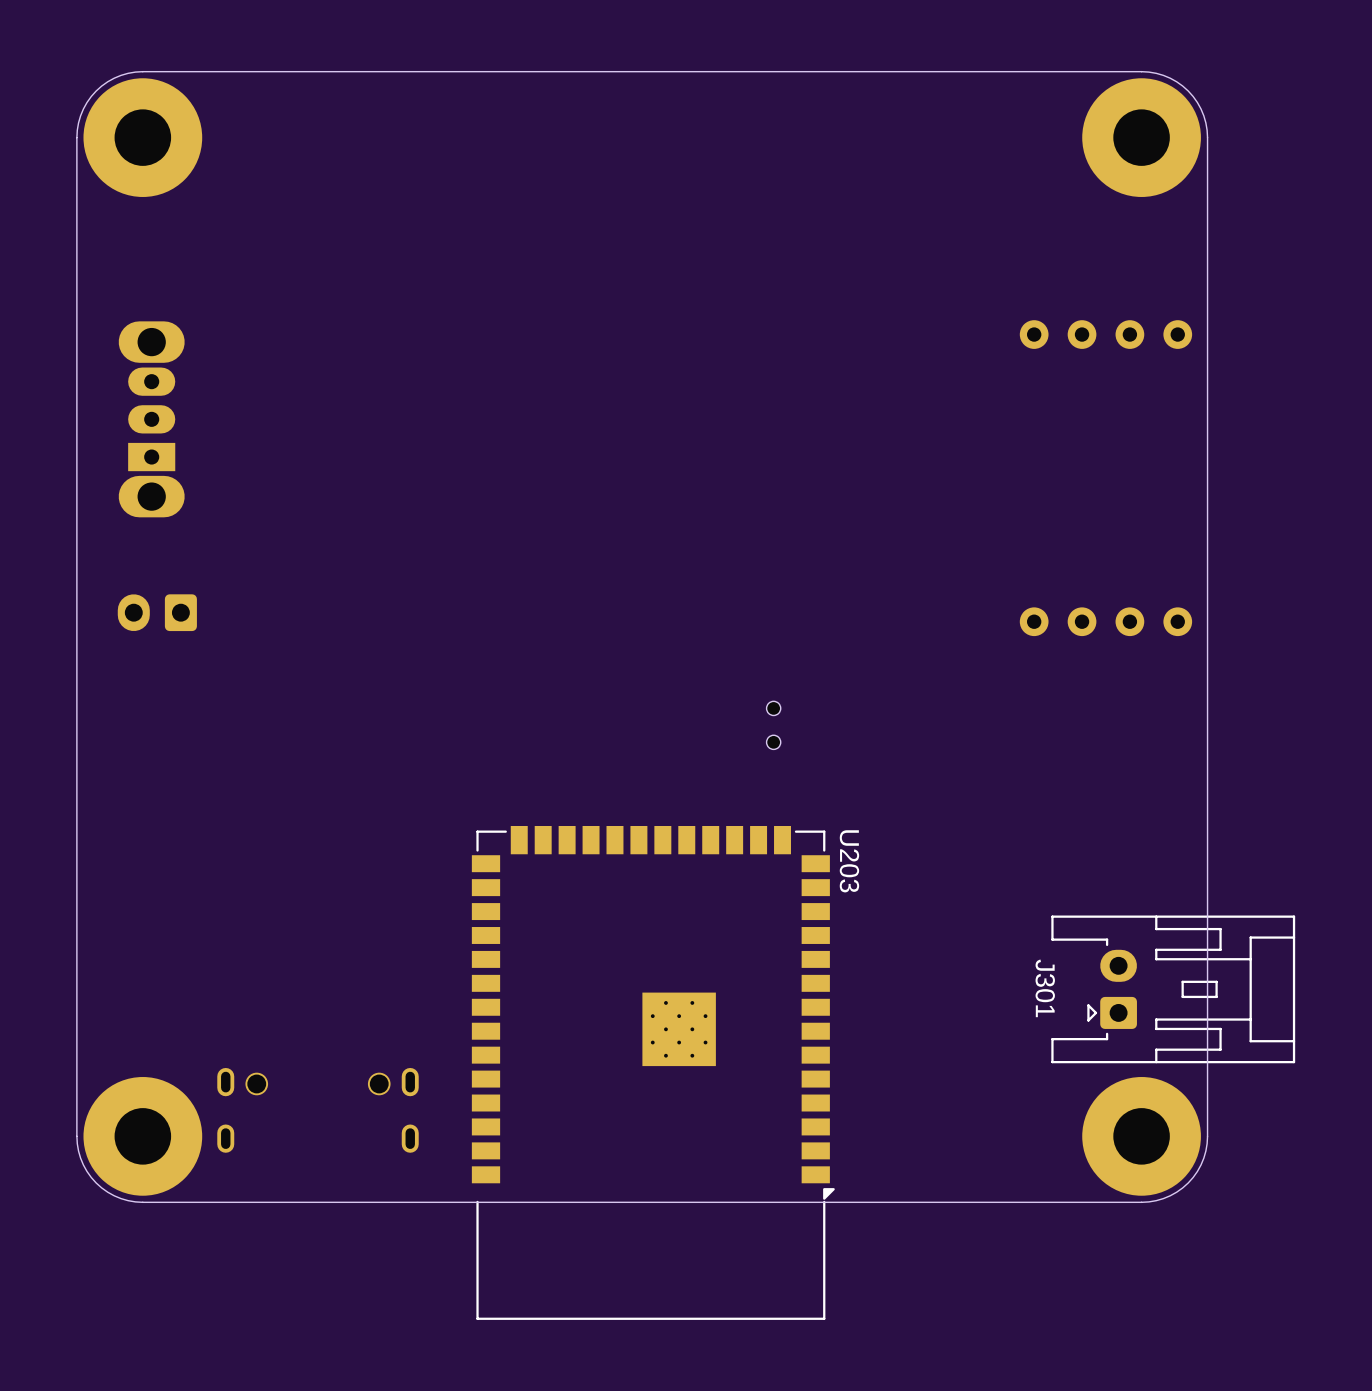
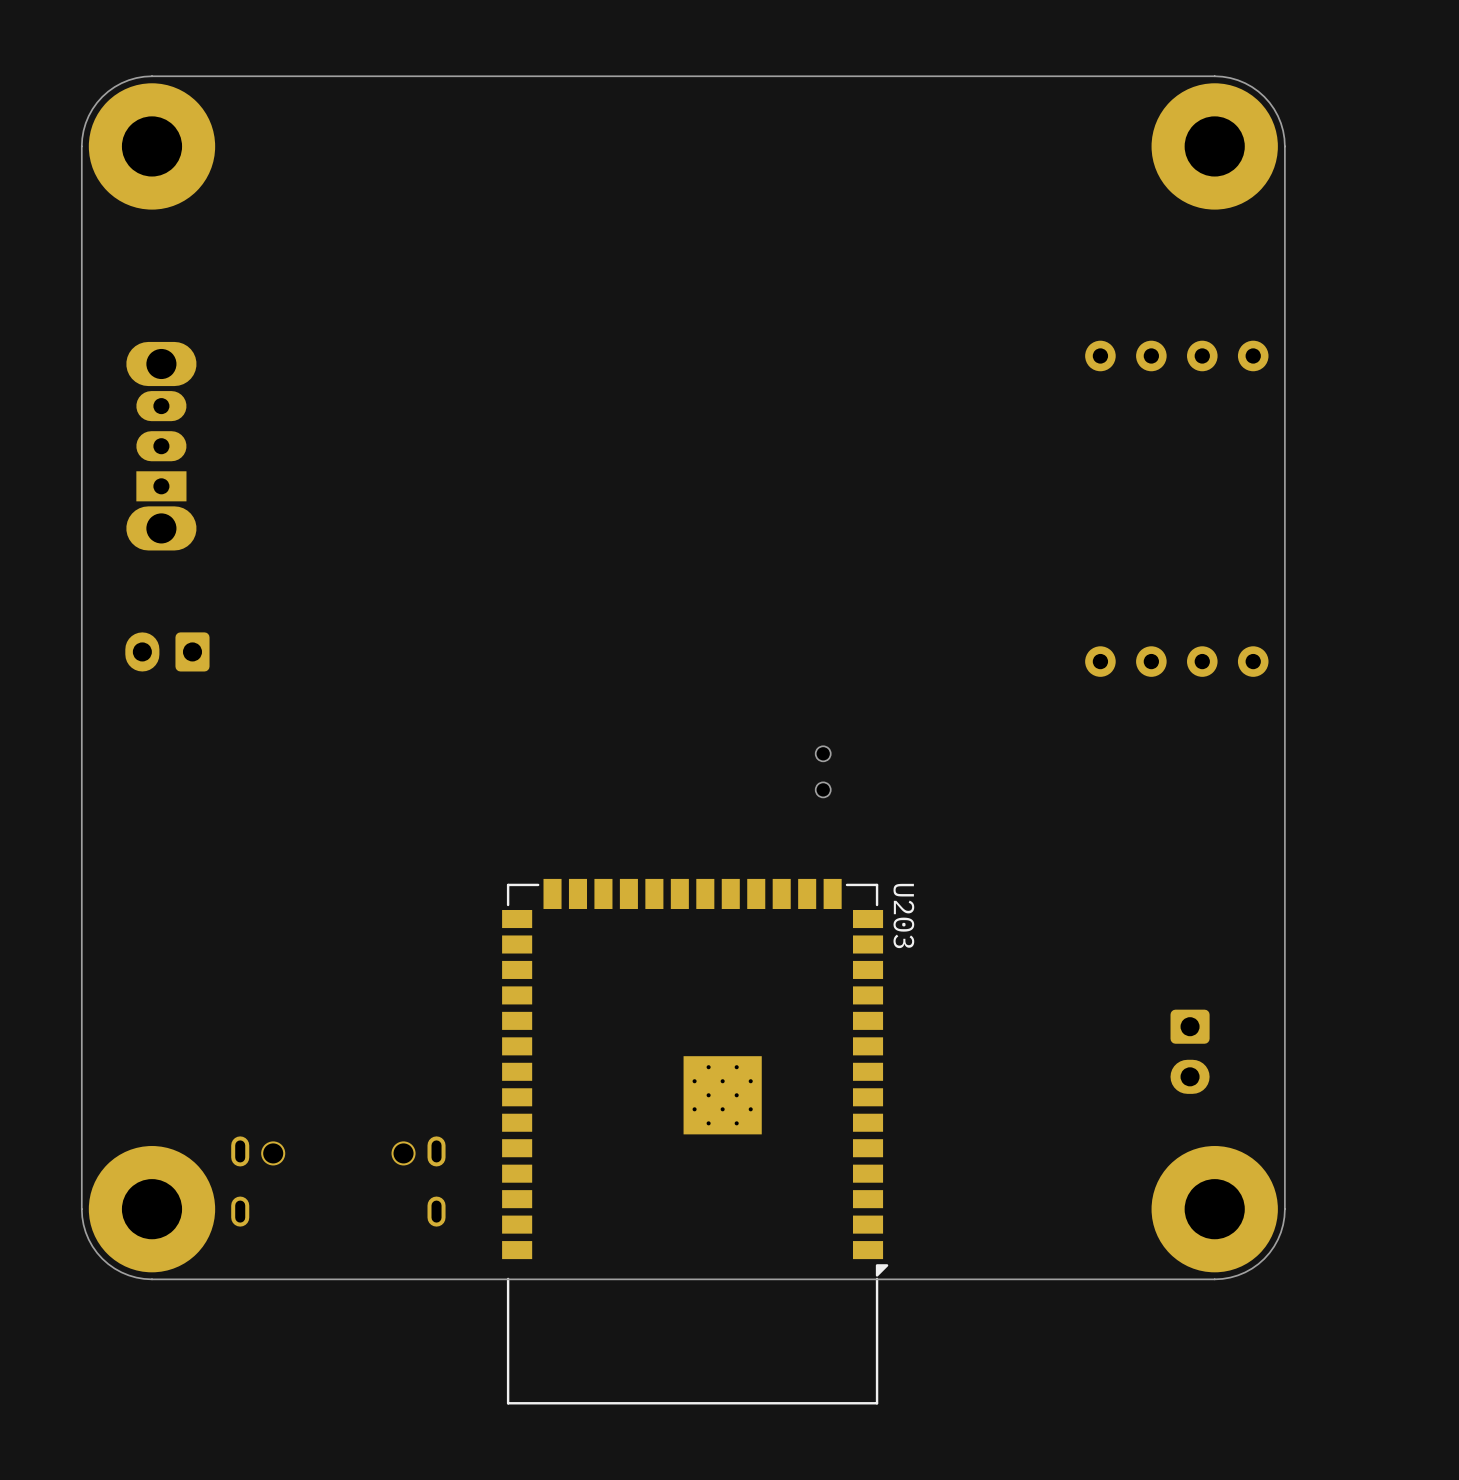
J301 side: bottom (1173, 989) -> top (1190, 1051)

